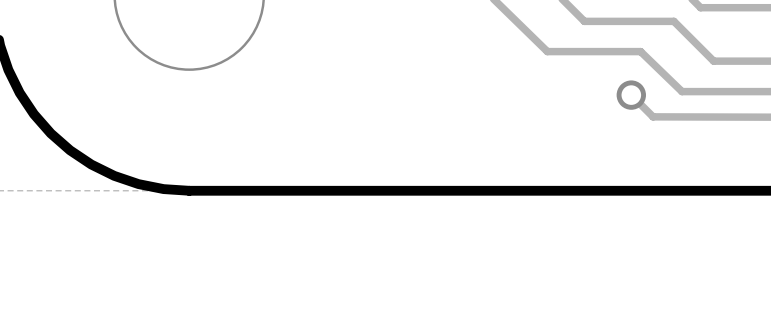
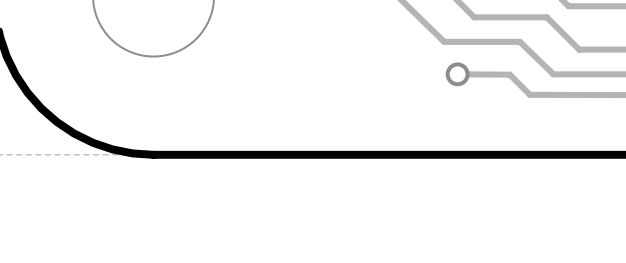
track: none -> (457, 74) (509, 74) (512, 77)
via position: (631, 95) -> (457, 74)

